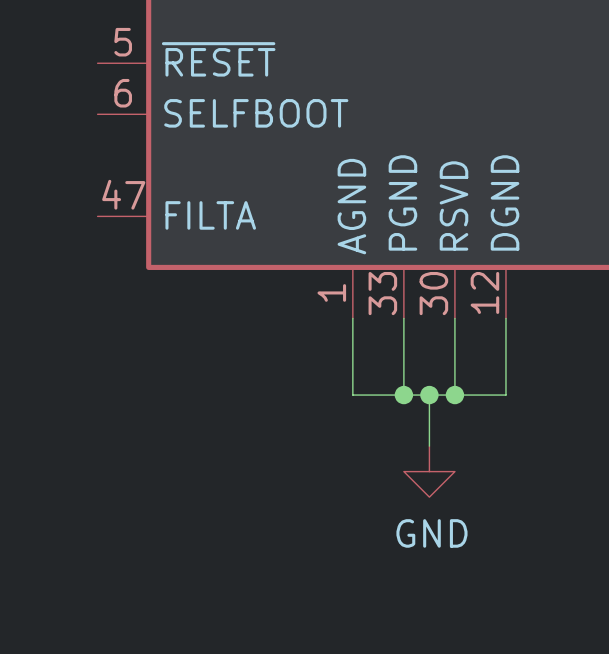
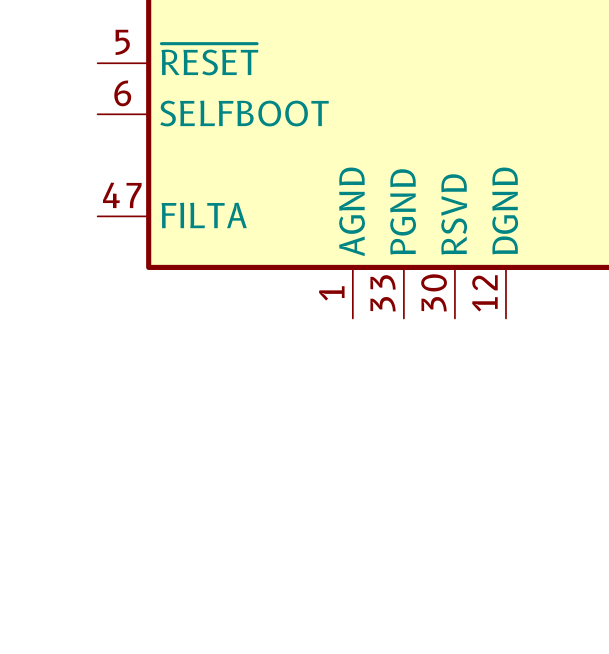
wire: (352, 318) (352, 395) (505, 395) (505, 318) -> none
wire: (403, 318) (403, 395) -> none
wire: (454, 318) (454, 395) -> none
junction: (403, 395) -> none
wire: (429, 395) (429, 446) -> none
junction: (429, 395) -> none
junction: (454, 395) -> none
power symbol: GND (429, 471) -> none

